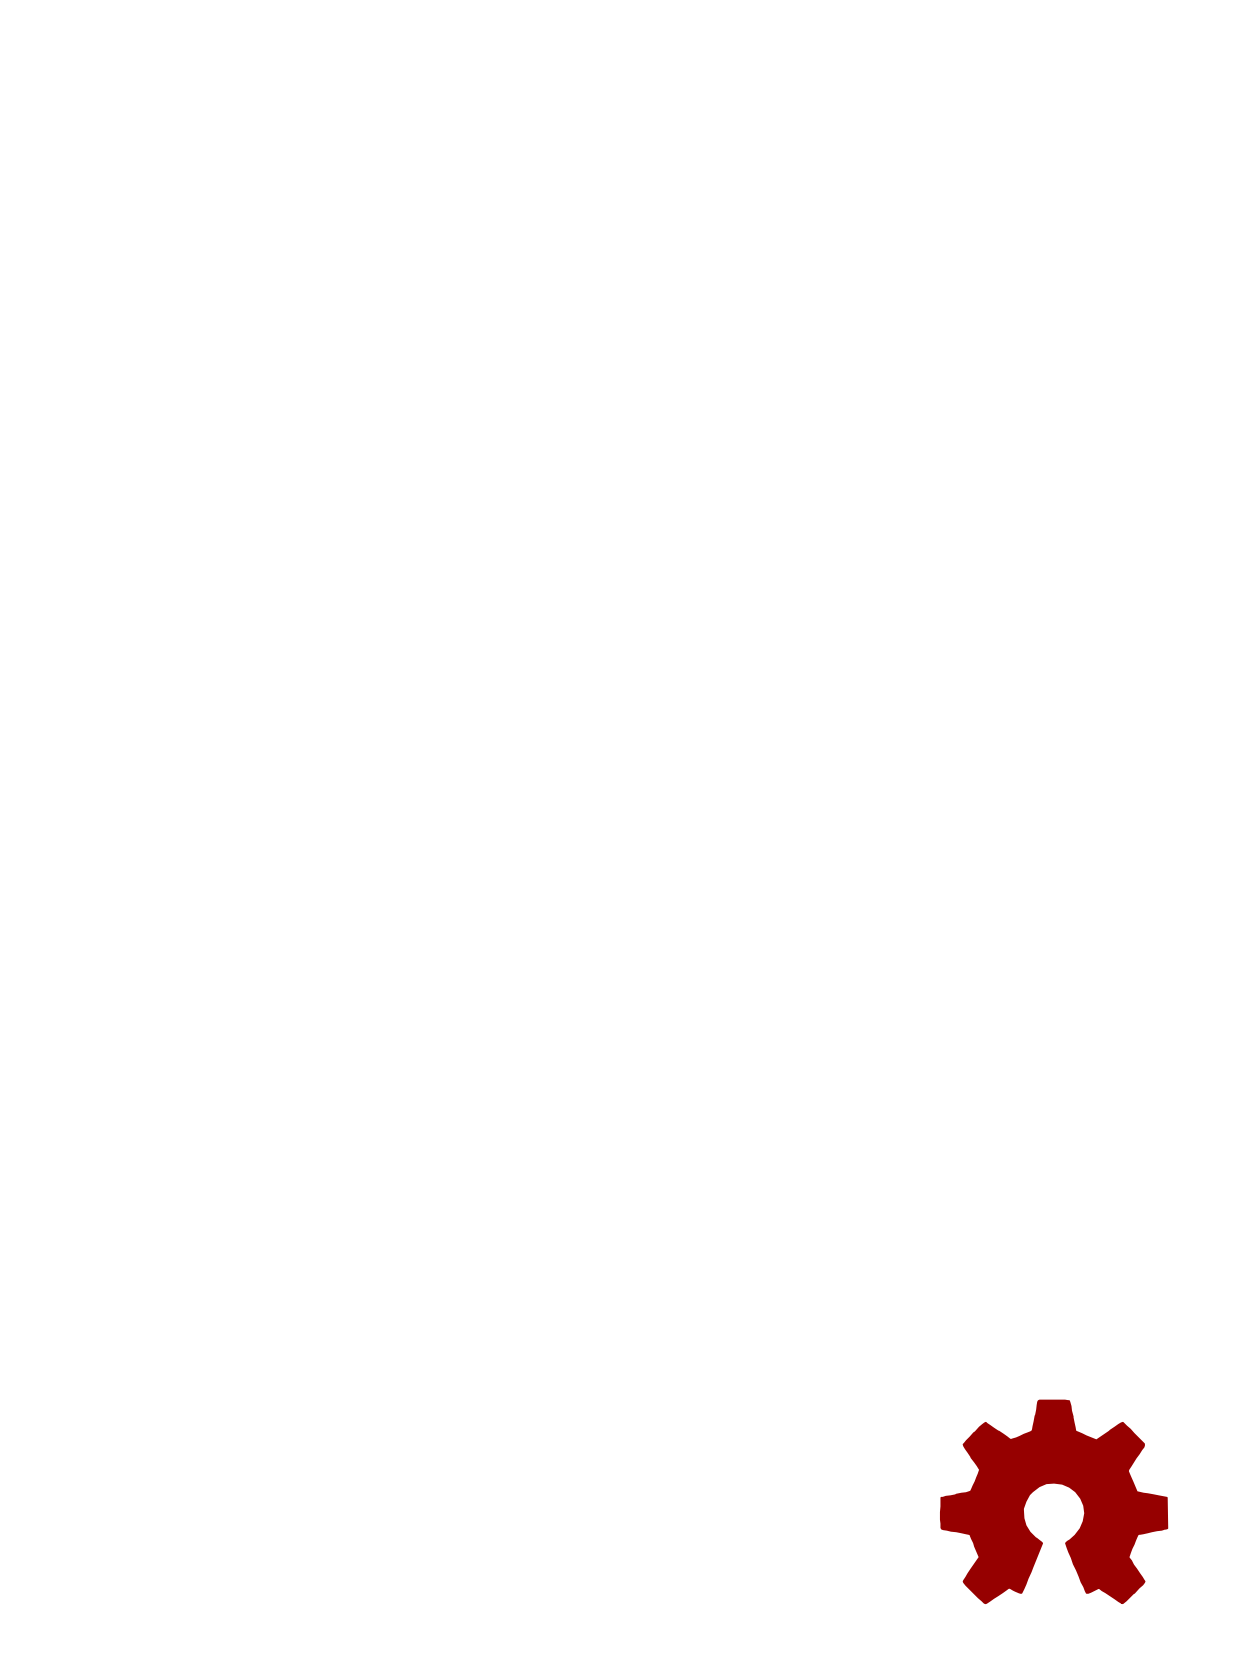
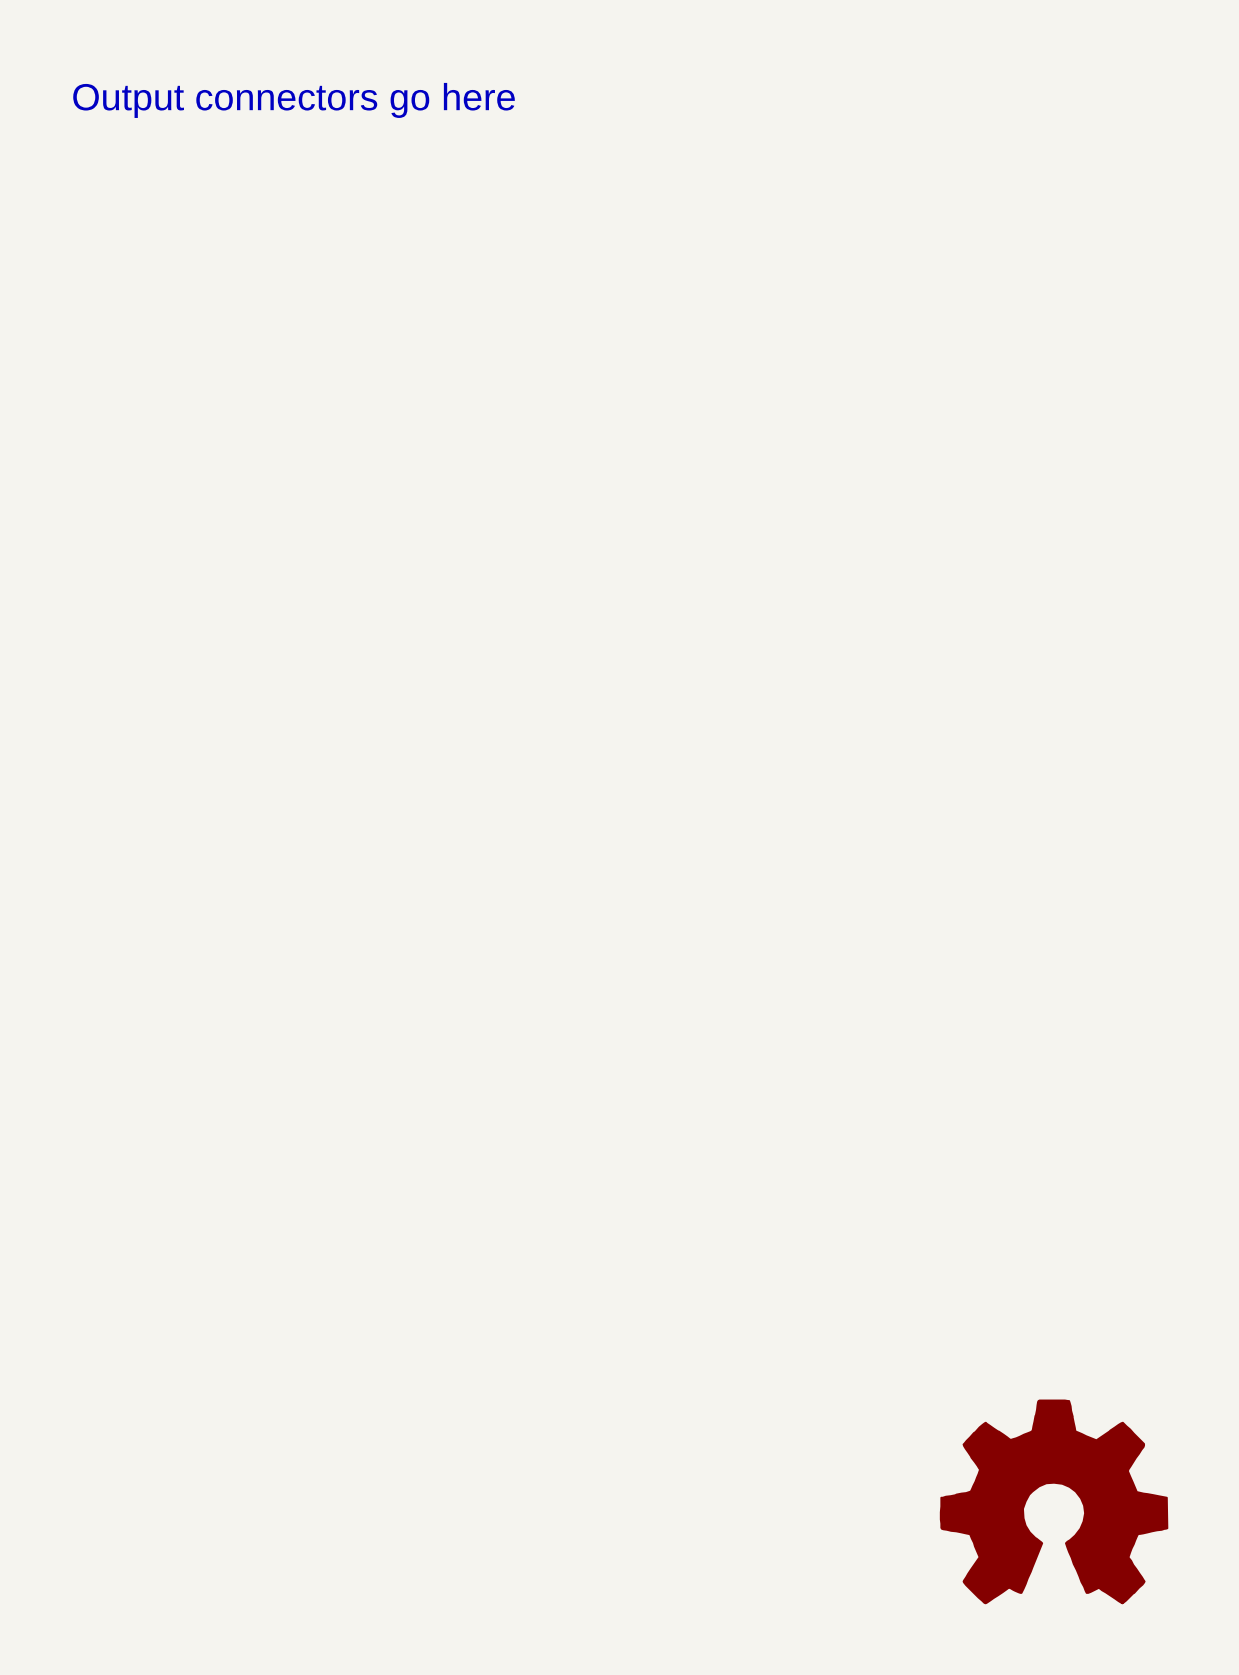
text: none -> Output connectors go here (294, 100)

